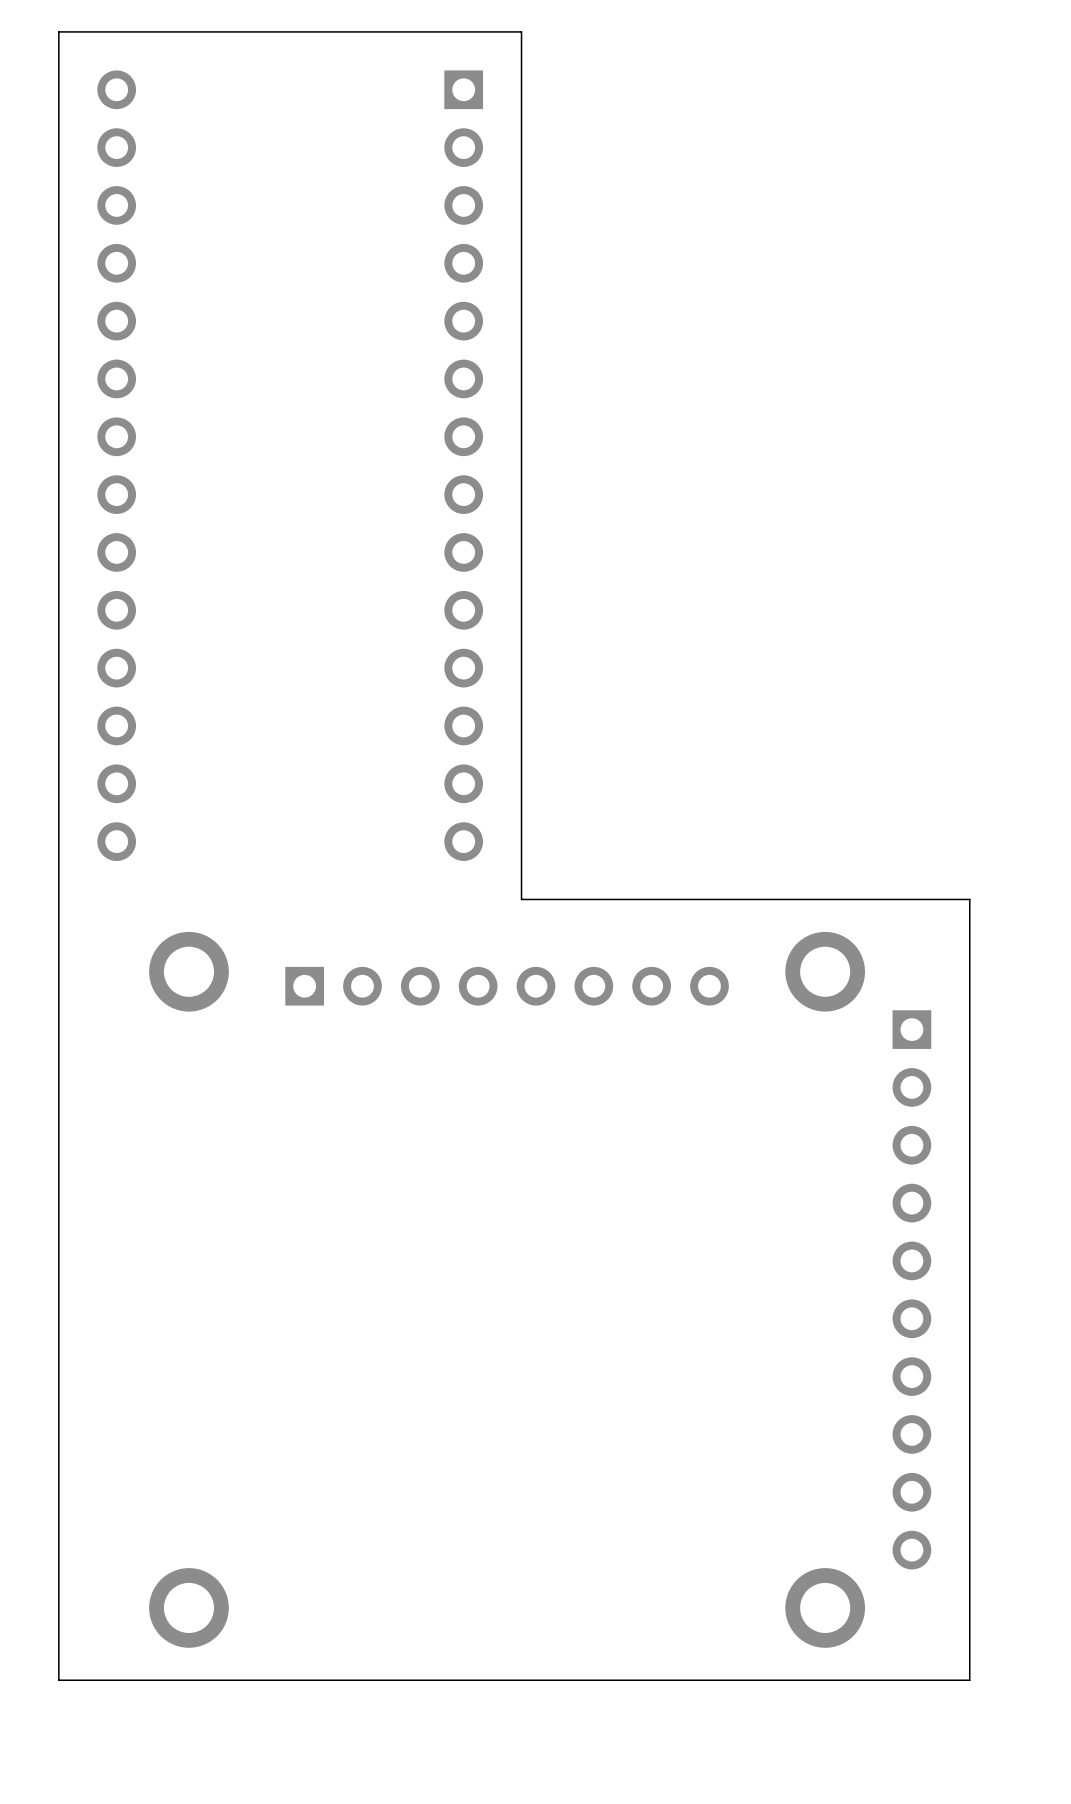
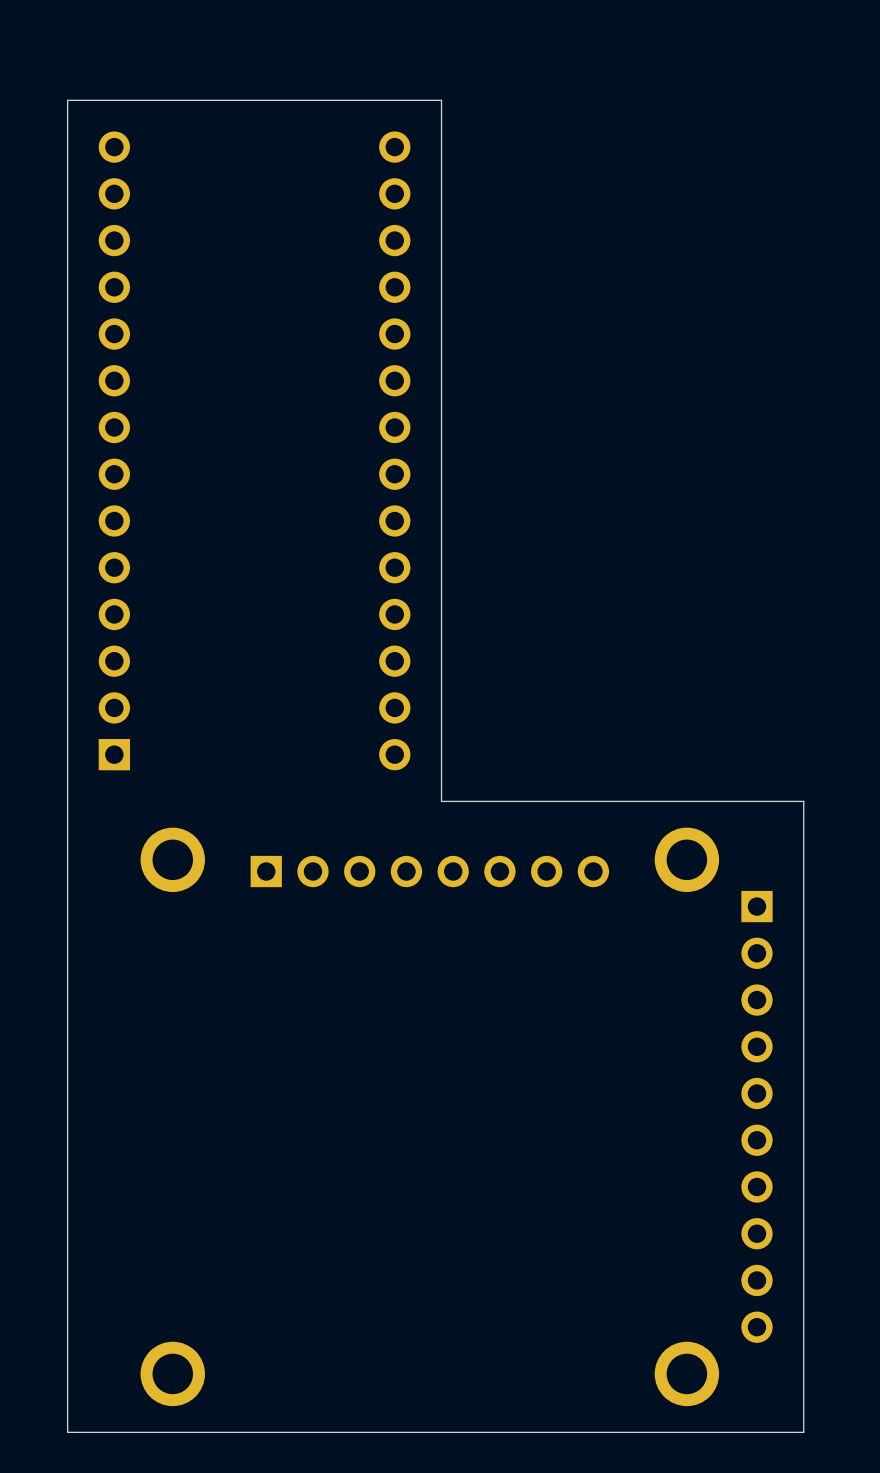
part footprint: [97, 70, 137, 861] -> [98, 131, 131, 771]
part footprint: [444, 70, 484, 861] -> [379, 131, 411, 771]

